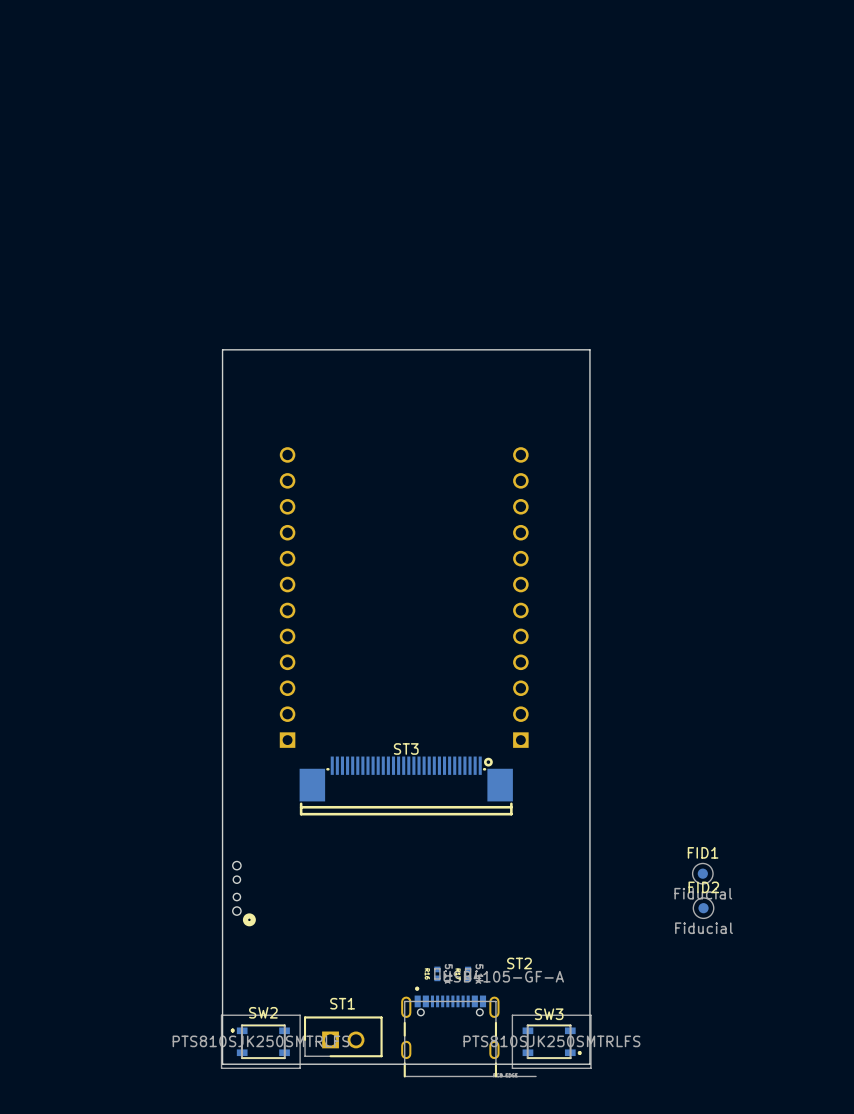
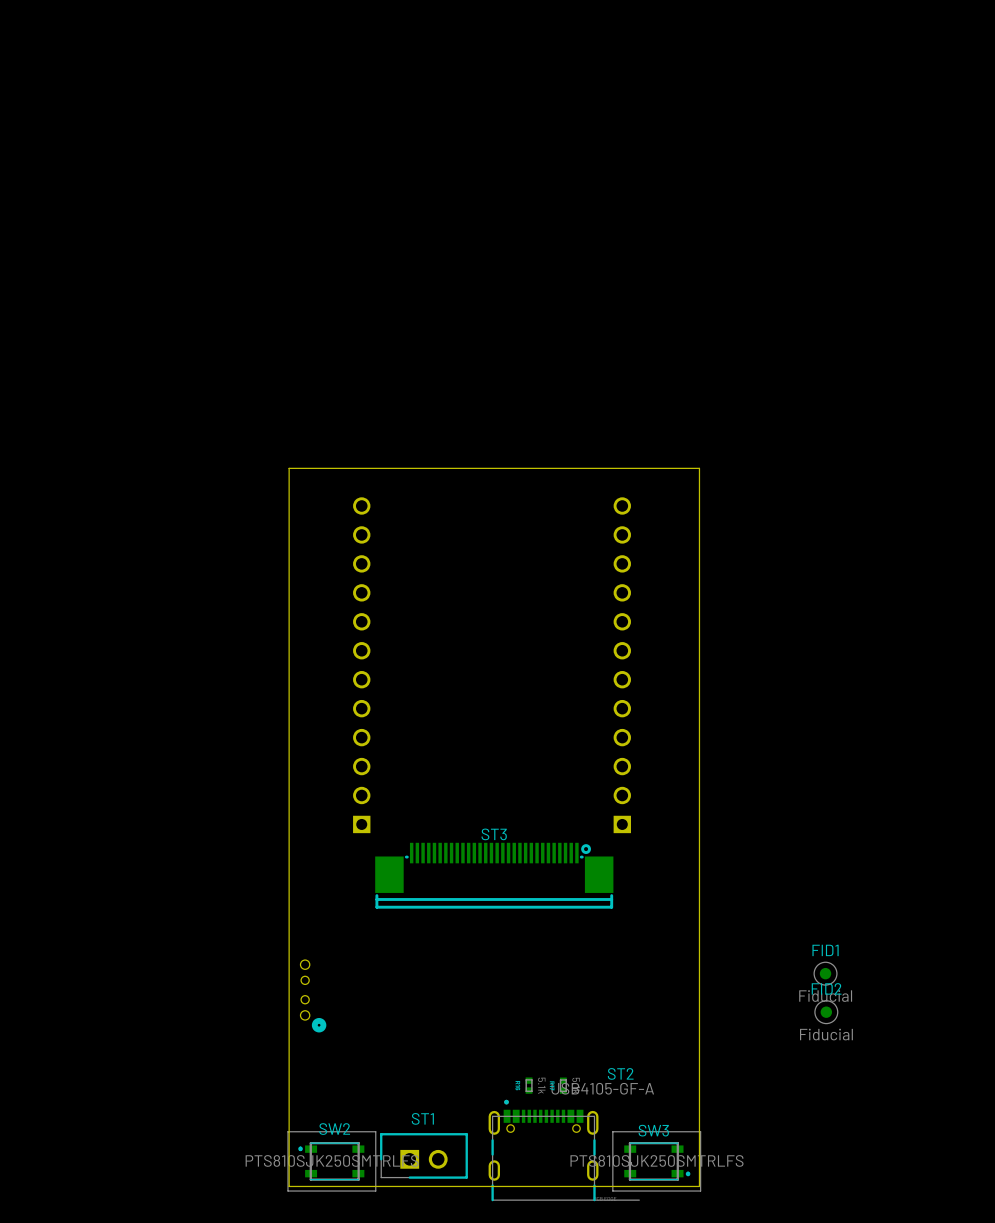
board edge: (589, 421) (589, 349) (222, 349) (222, 421) -> (699, 468) (289, 468)

